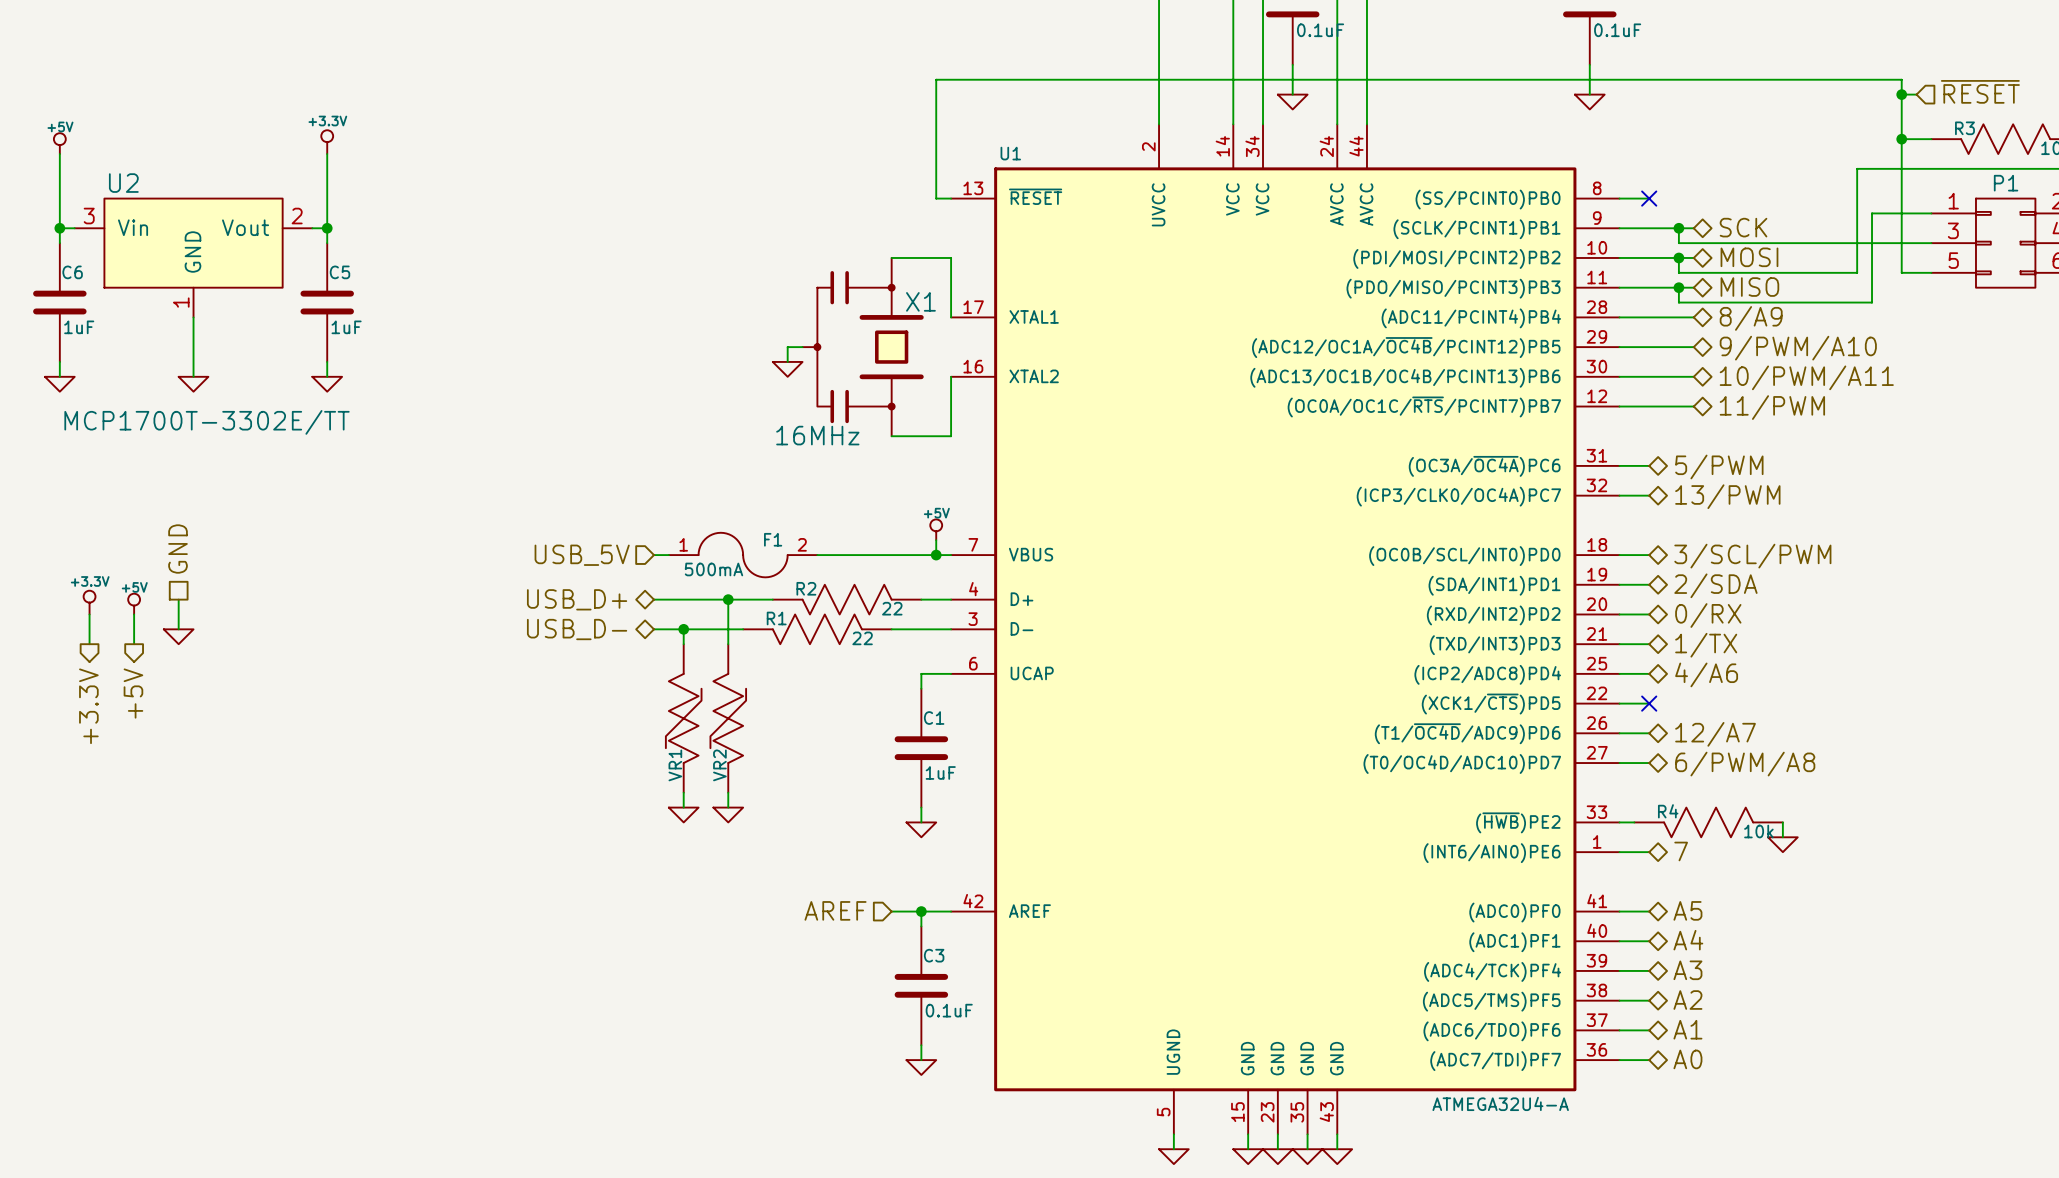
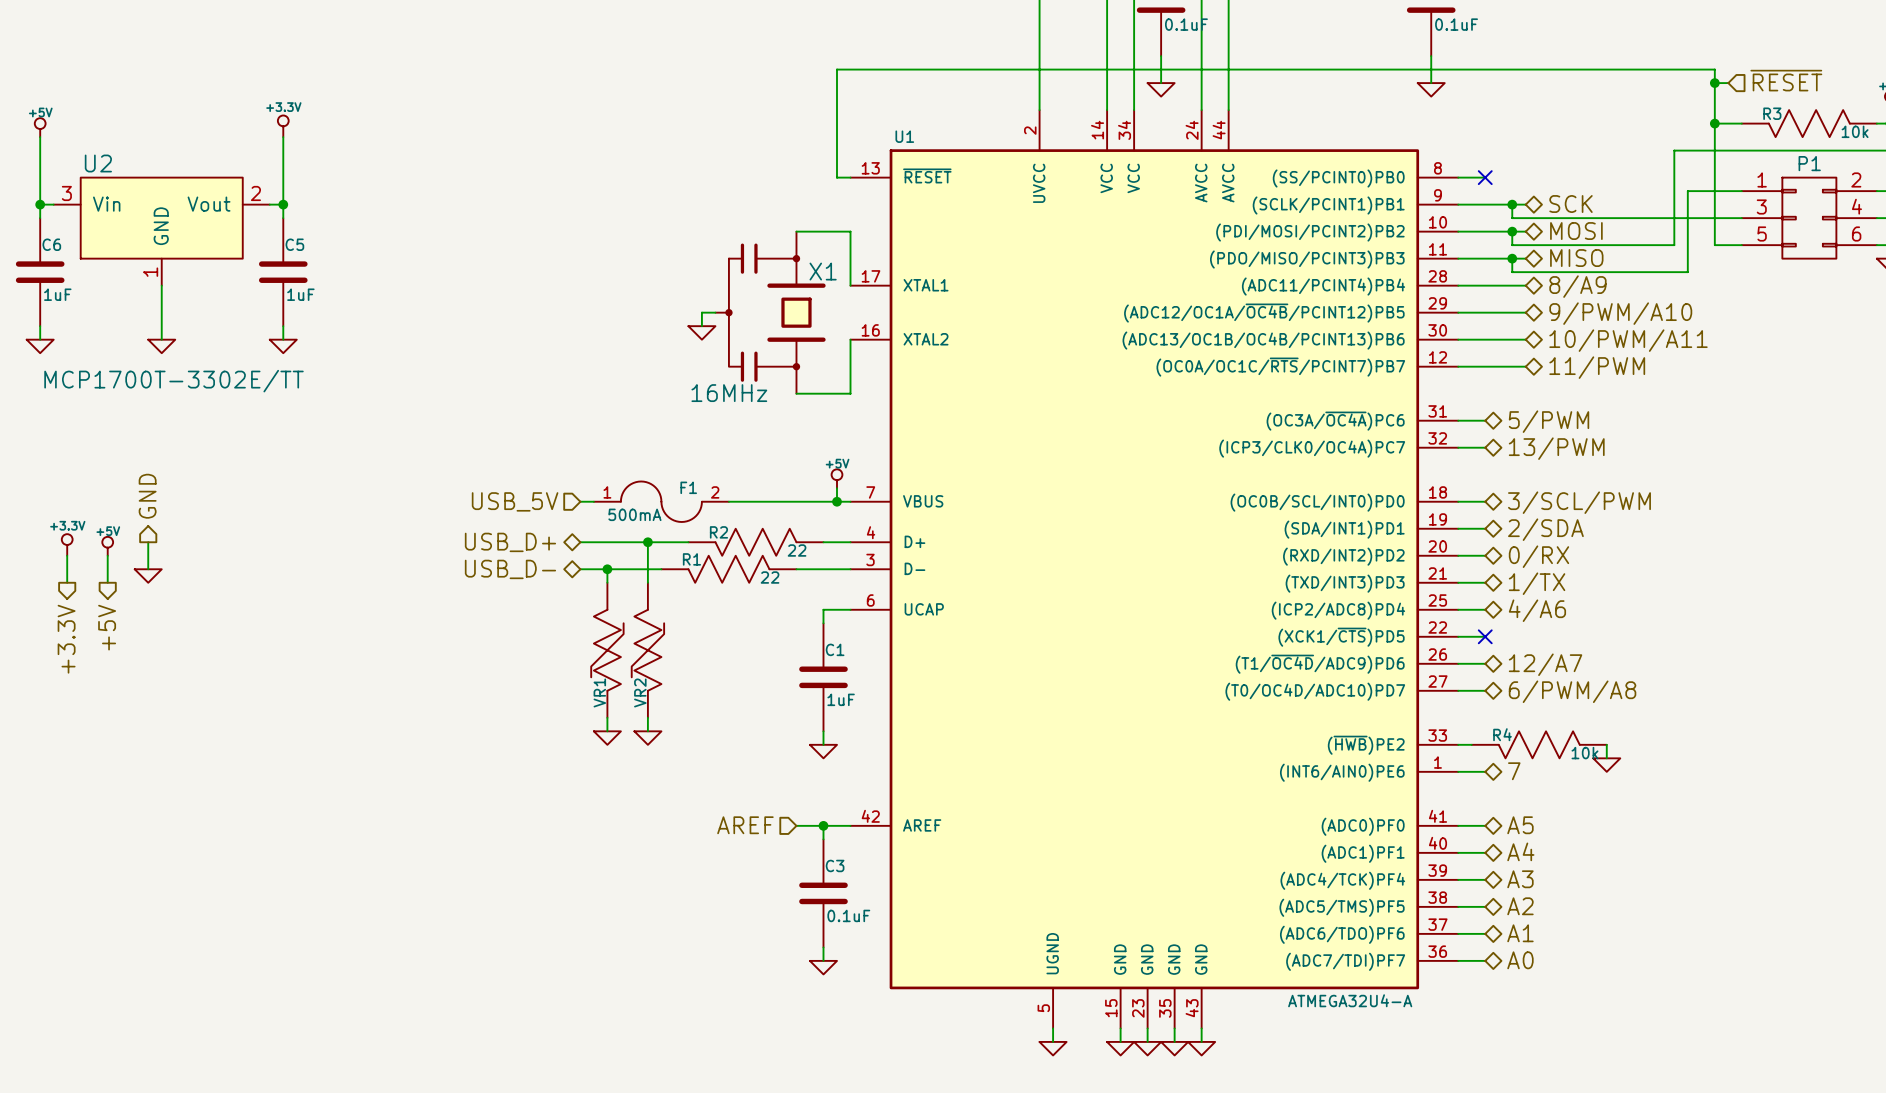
hierarchical label shape: passive (178, 549) -> output (147, 496)

